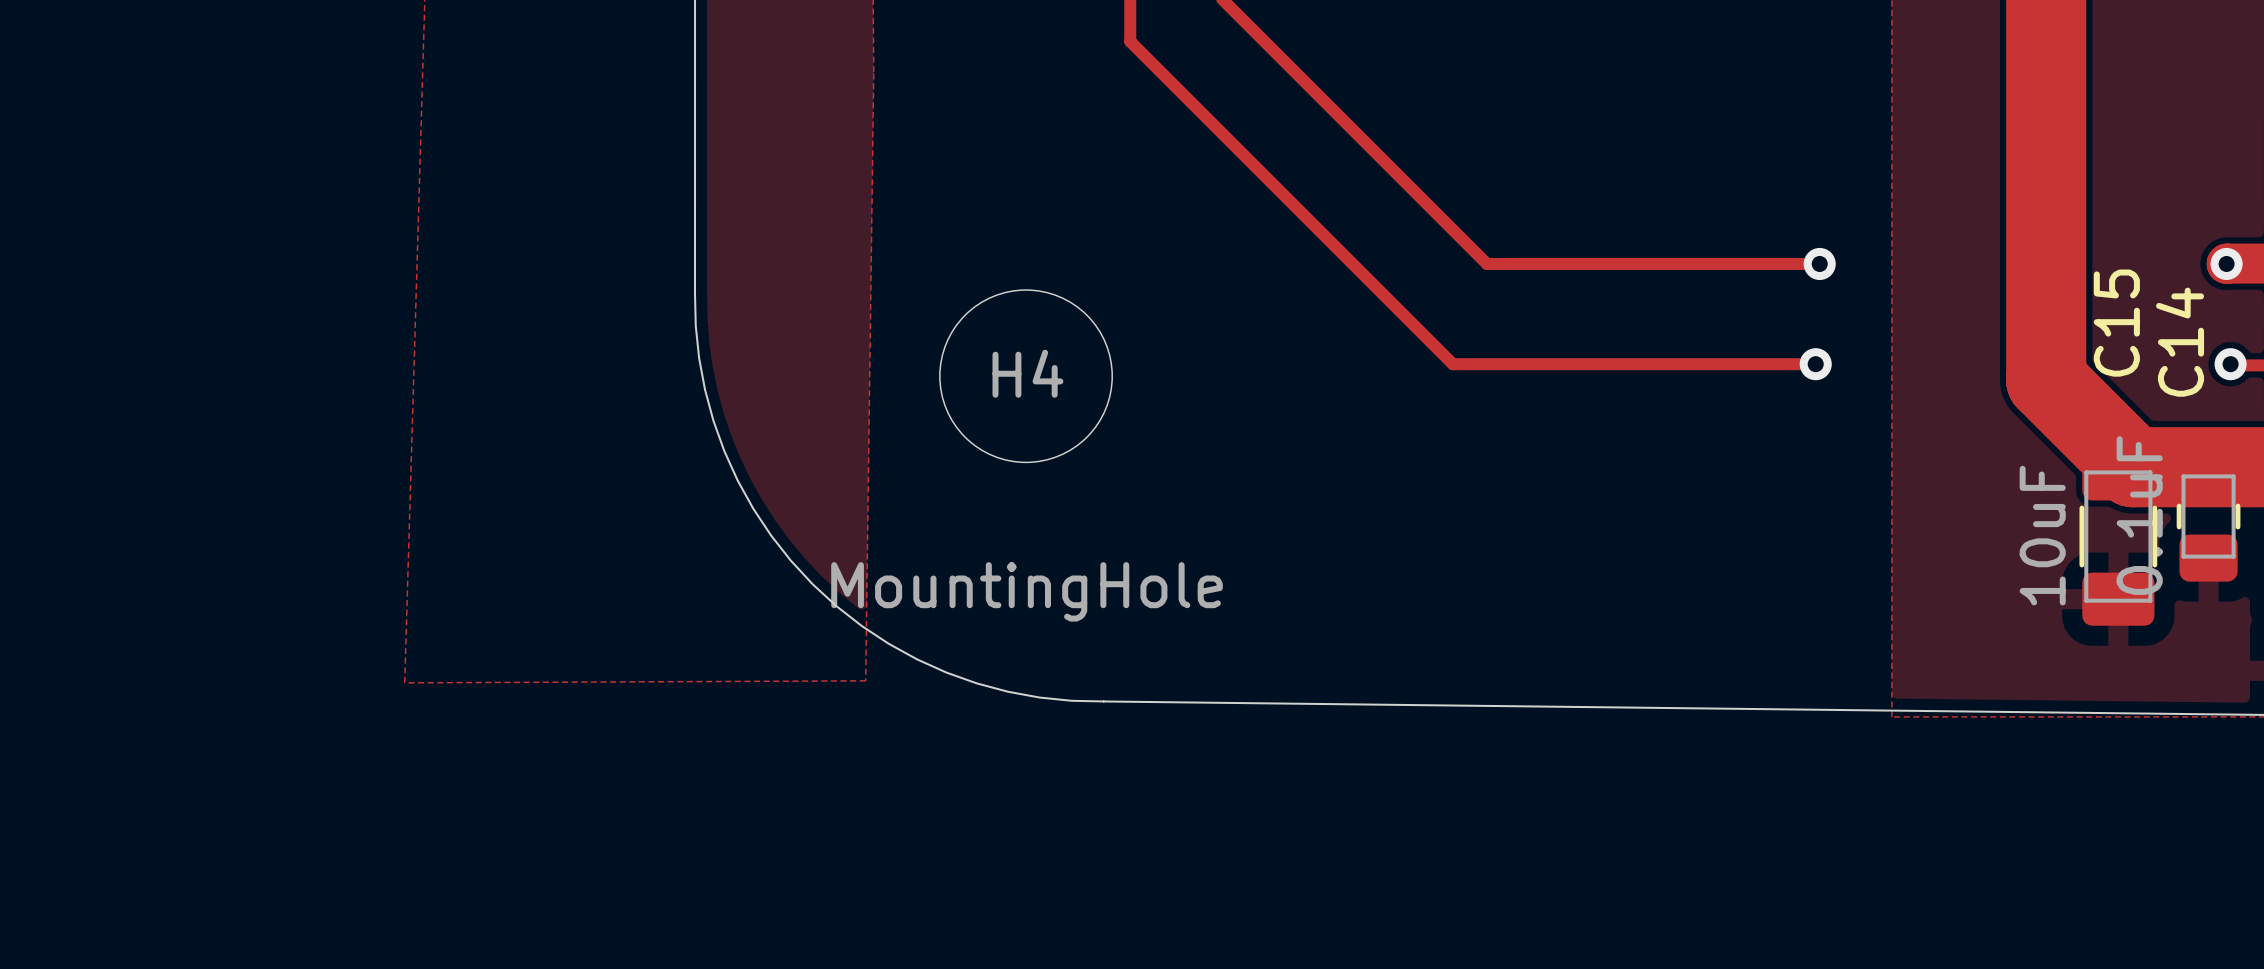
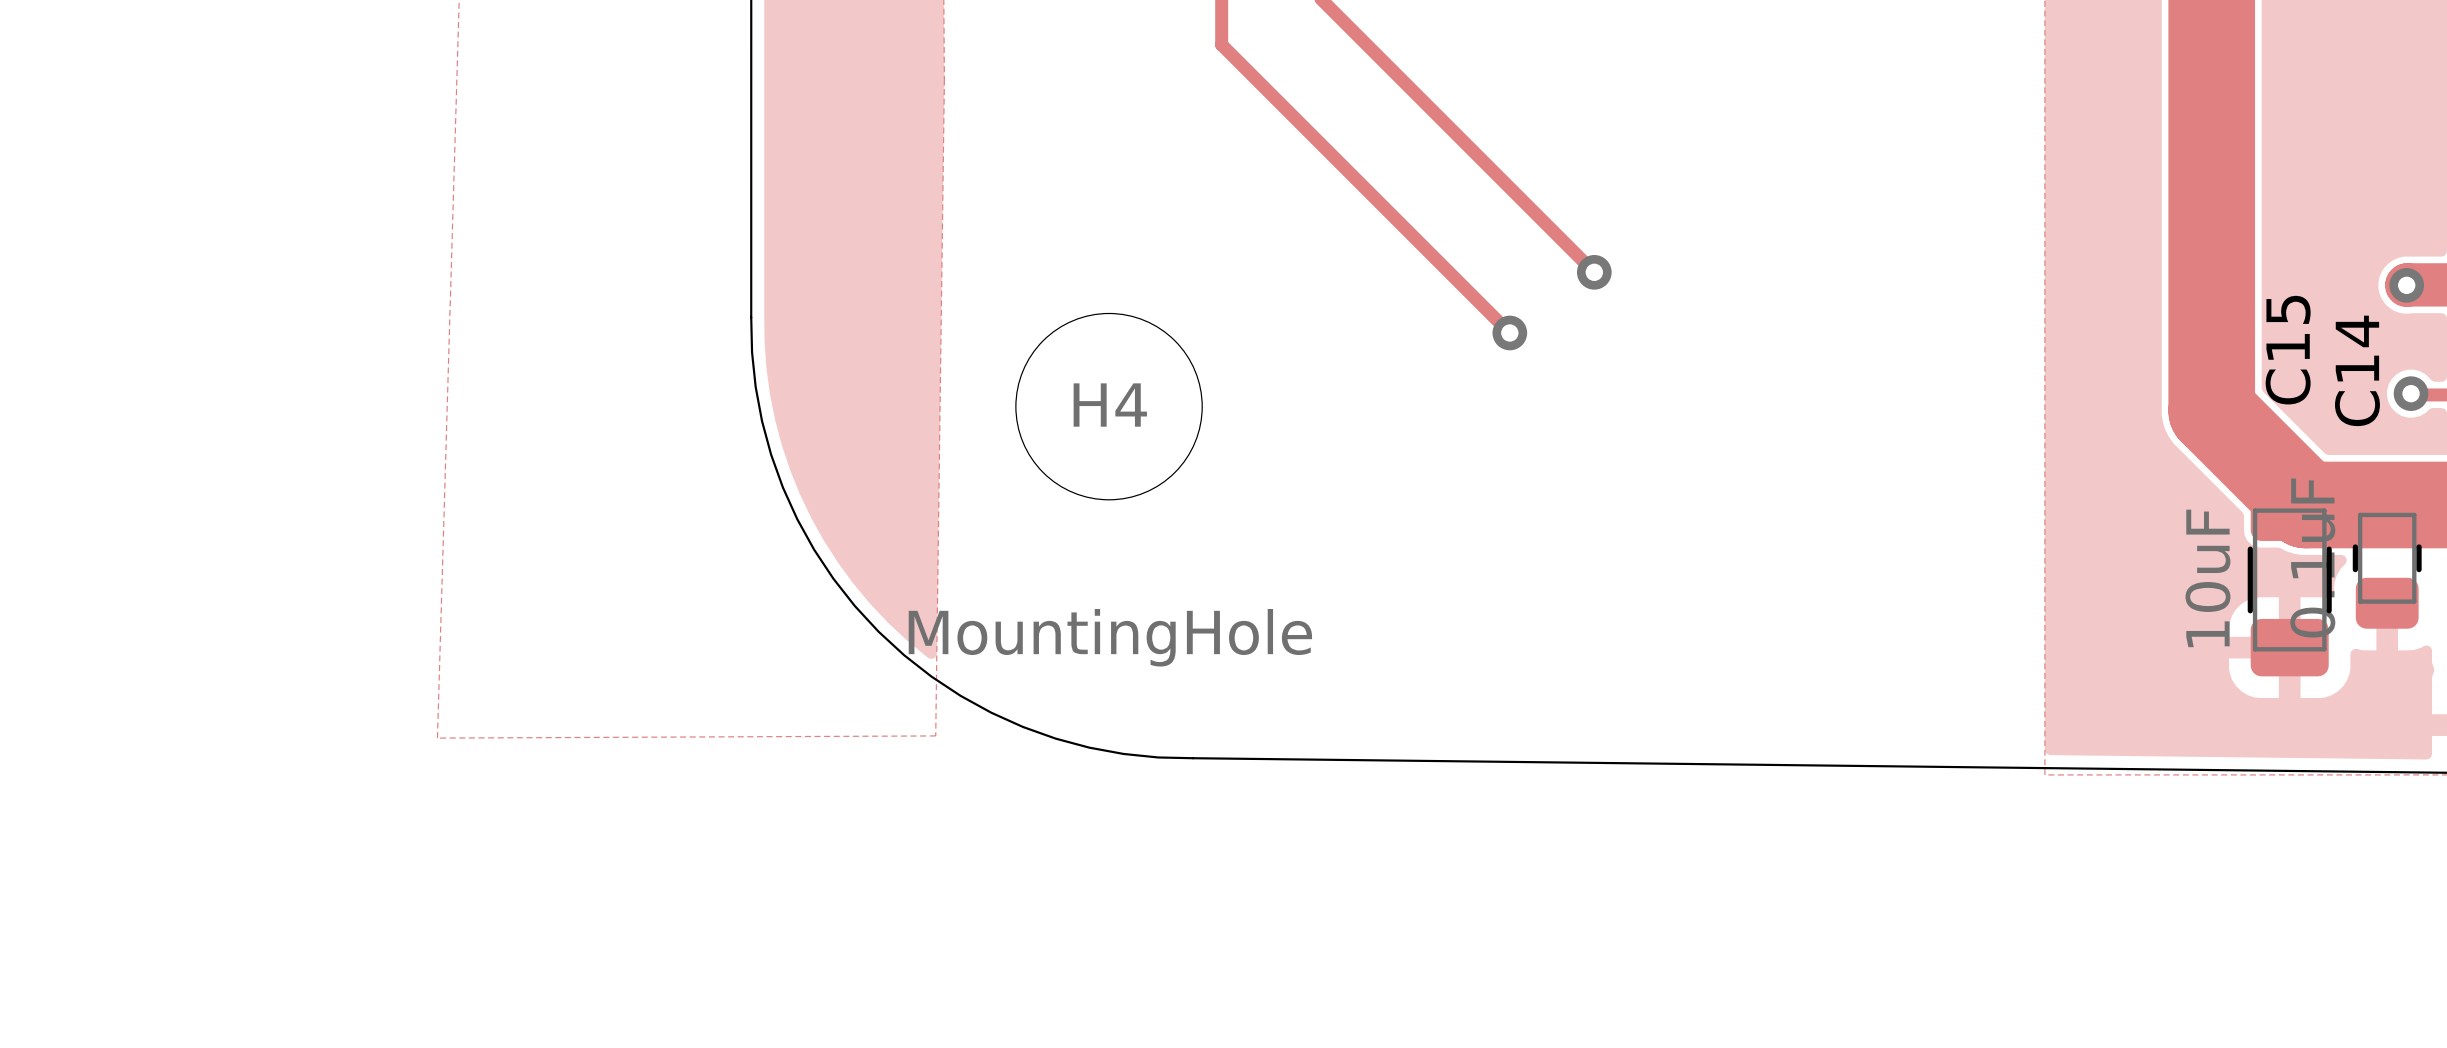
track: (1474, 251) (1487, 263) (1819, 263) -> none
via: none -> (1594, 272)
via: (1819, 263) -> none
track: (1396, 308) (1452, 364) (1815, 364) -> none
via: none -> (1509, 332)
via: (1815, 364) -> none

